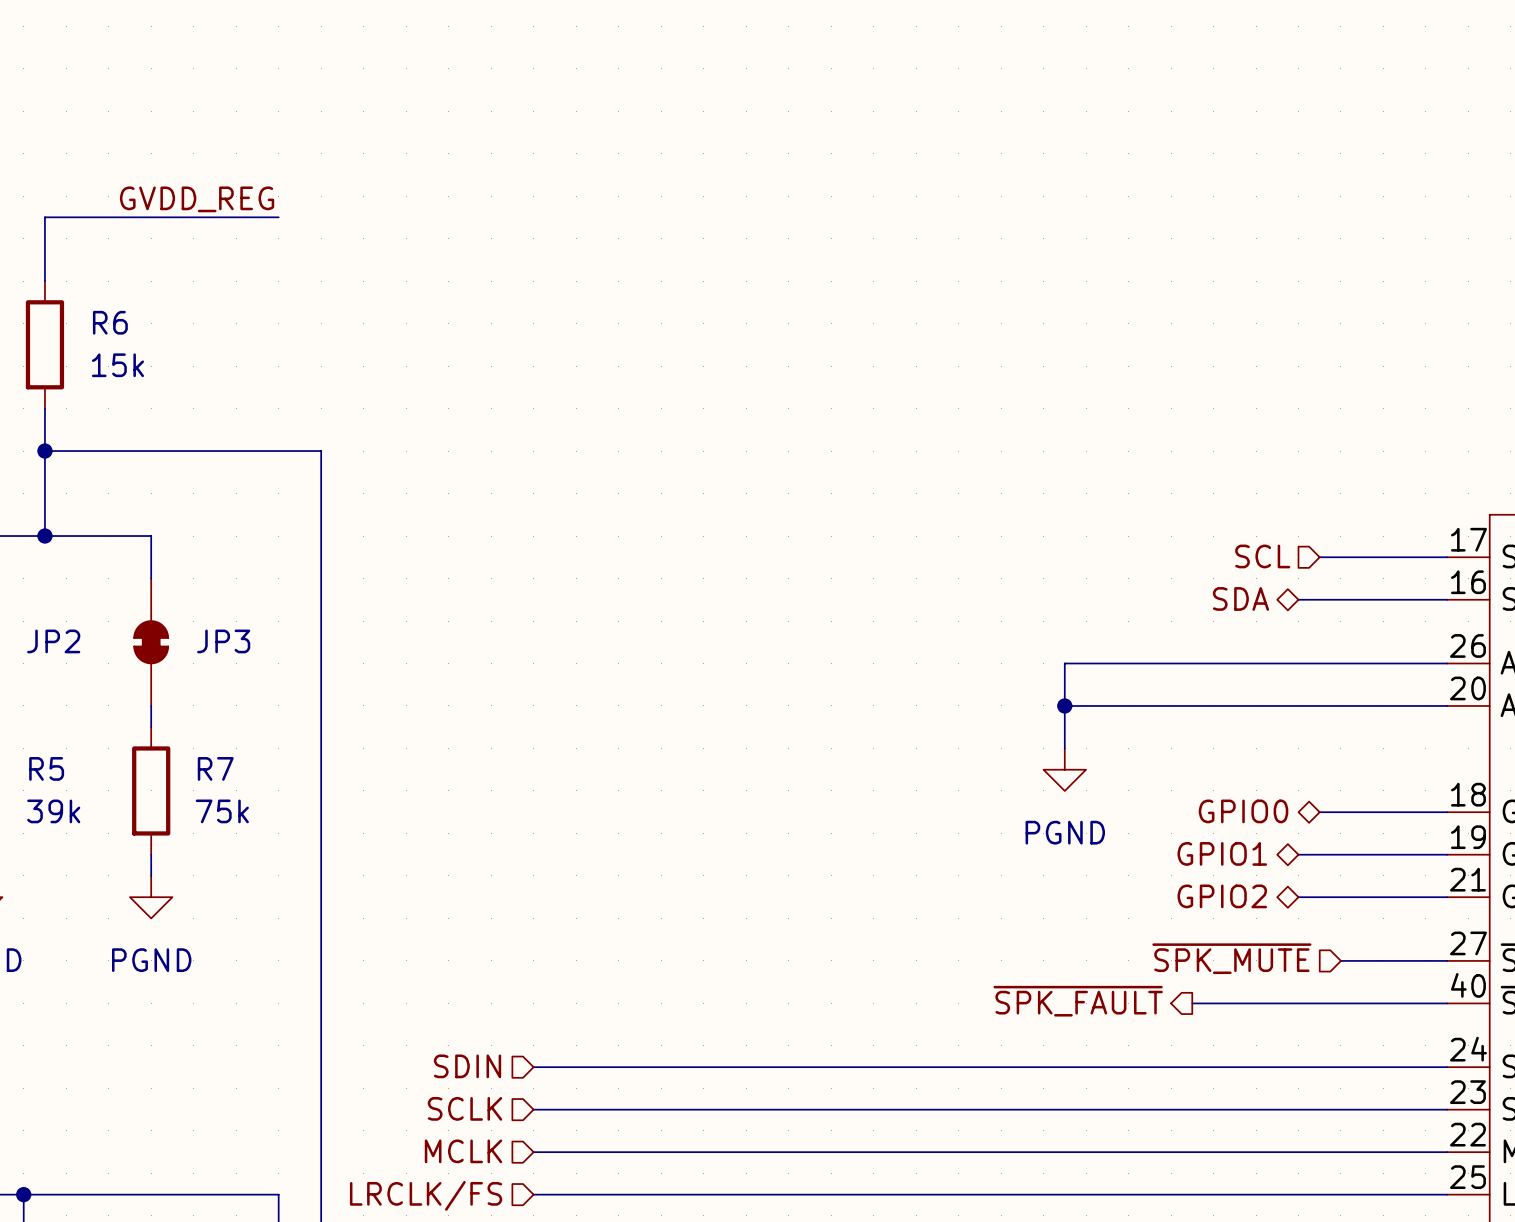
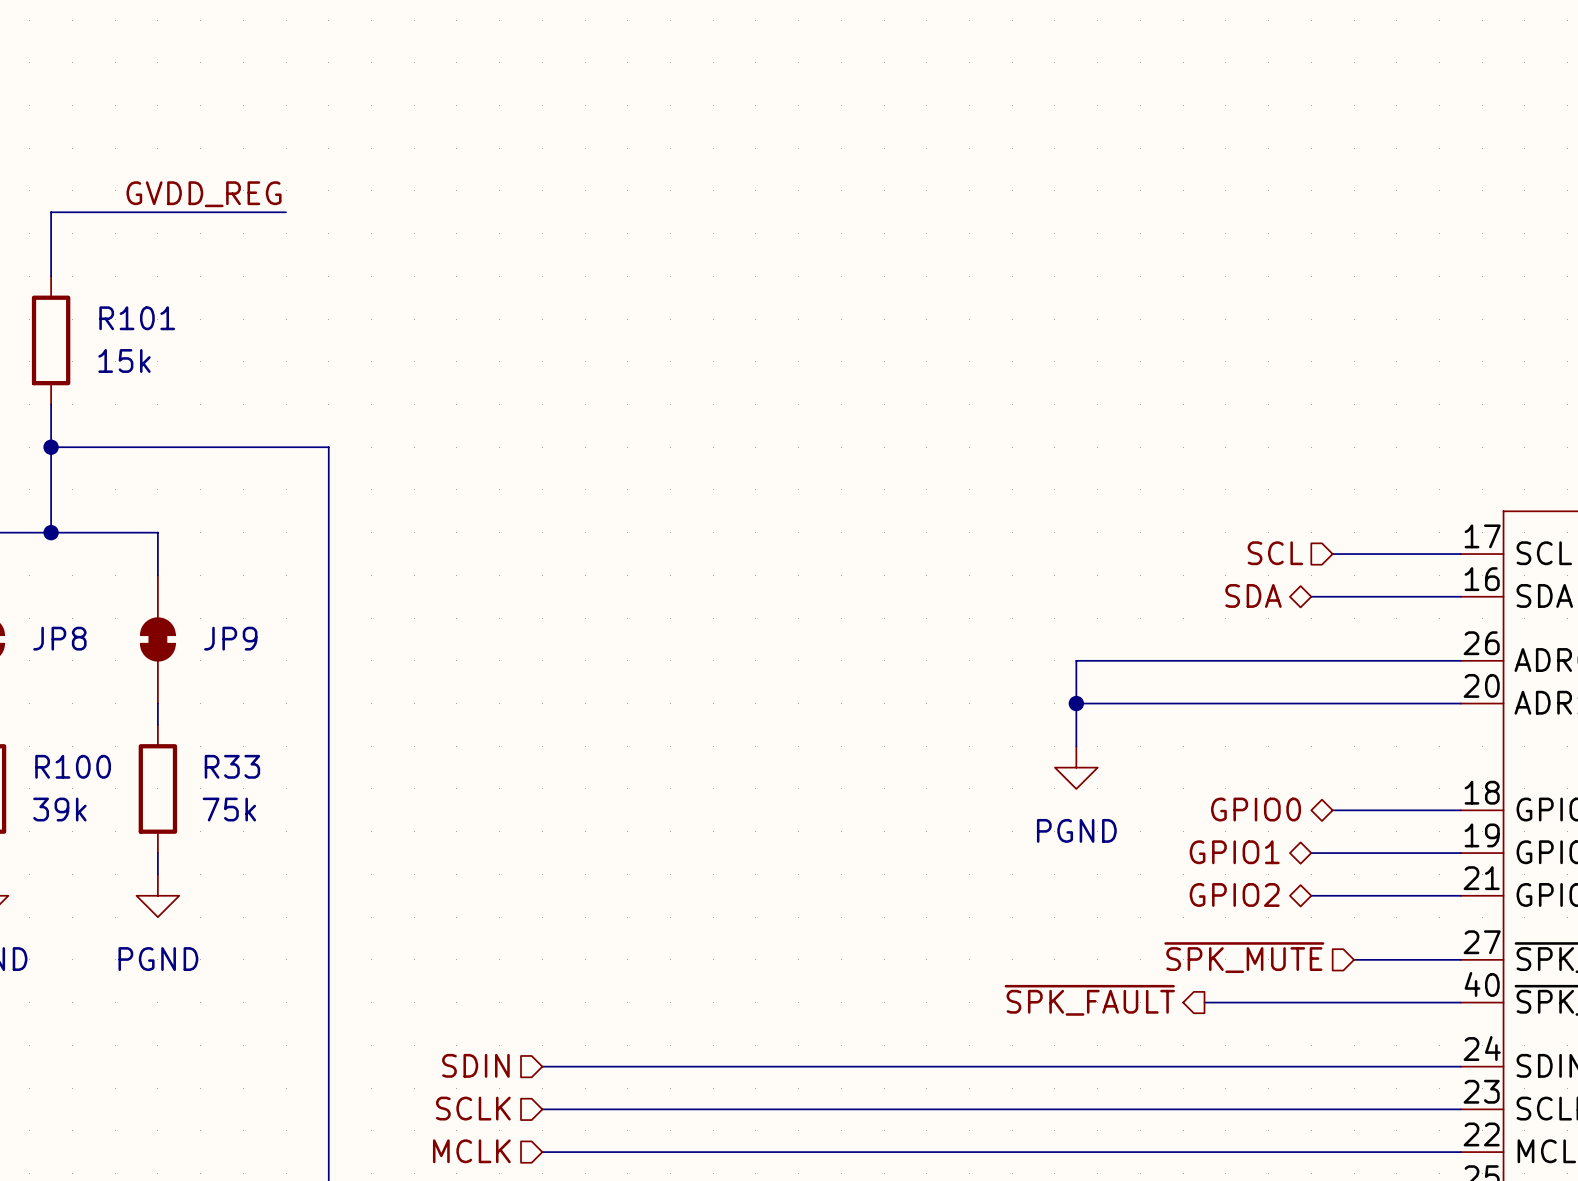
R6 name: R6 (110, 322) -> R101 (137, 318)
JP2 name: JP2 (53, 641) -> JP8 (59, 638)
JP3 name: JP3 (223, 641) -> JP9 (230, 638)
R5 name: R5 (46, 768) -> R100 (73, 766)
R7 name: R7 (215, 768) -> R33 (232, 766)

